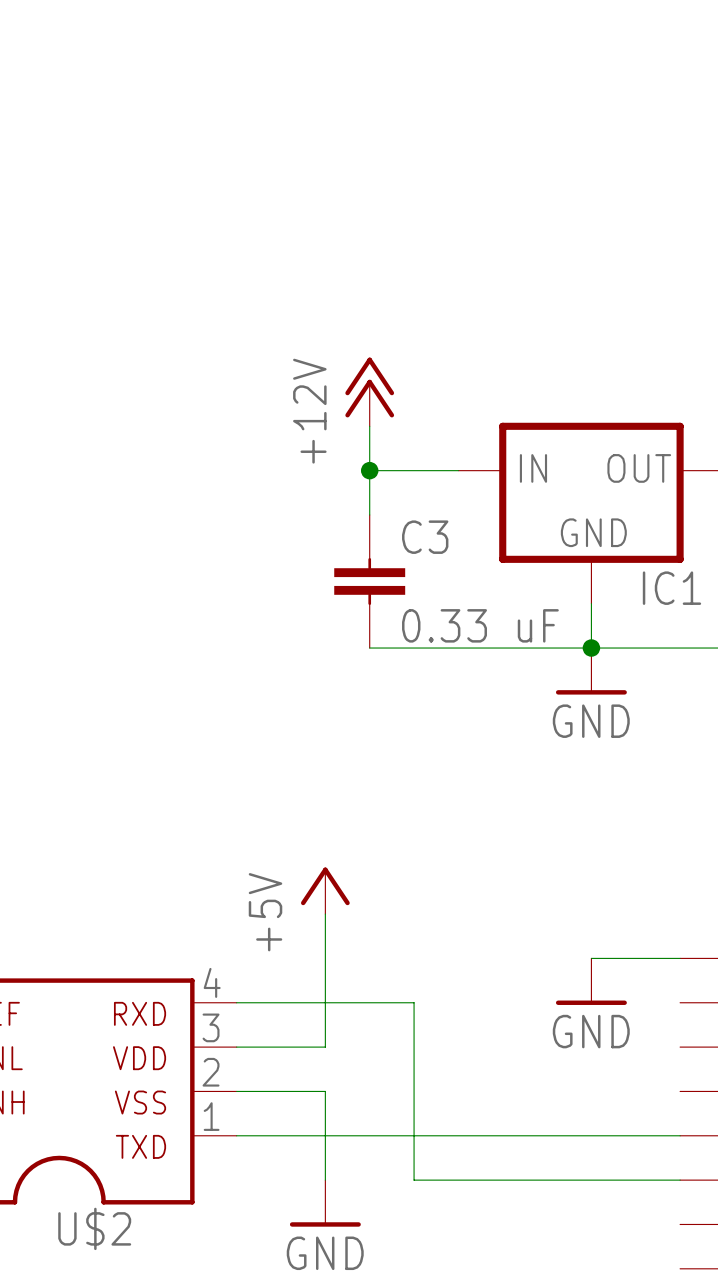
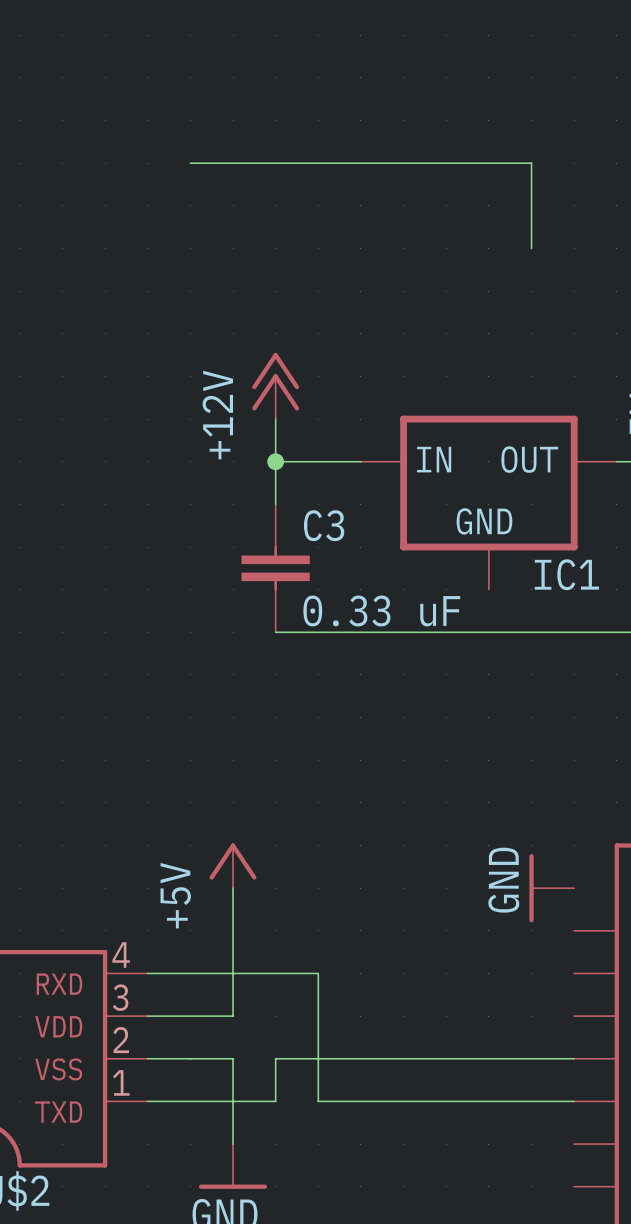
wire: none -> (190, 163) (531, 163) (531, 248)
wire: (591, 603) (591, 648) -> none
junction: (591, 648) -> none
power symbol: GND (591, 671) -> none
wire: (591, 958) (680, 958) -> none
power symbol position: GND (591, 981) -> GND (551, 888)
power symbol rotation: 0° (591, 1002) -> 90° clockwise (531, 888)
wire: (369, 1135) (414, 1135) (414, 1180) (680, 1180) -> (275, 1101) (275, 1058) (574, 1058)

